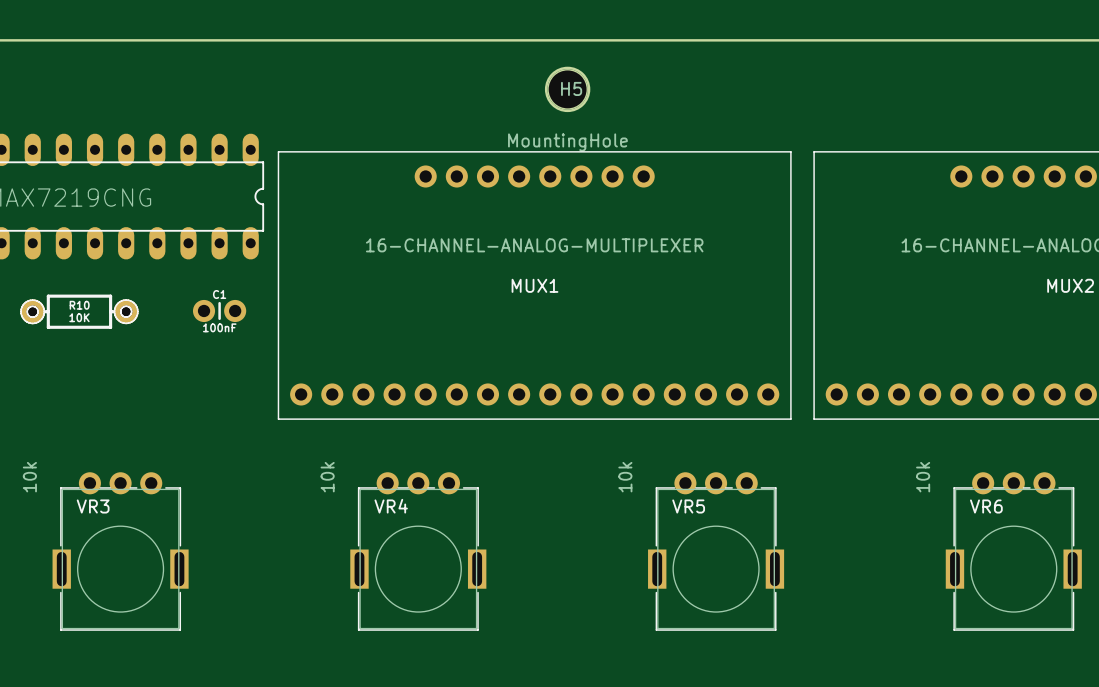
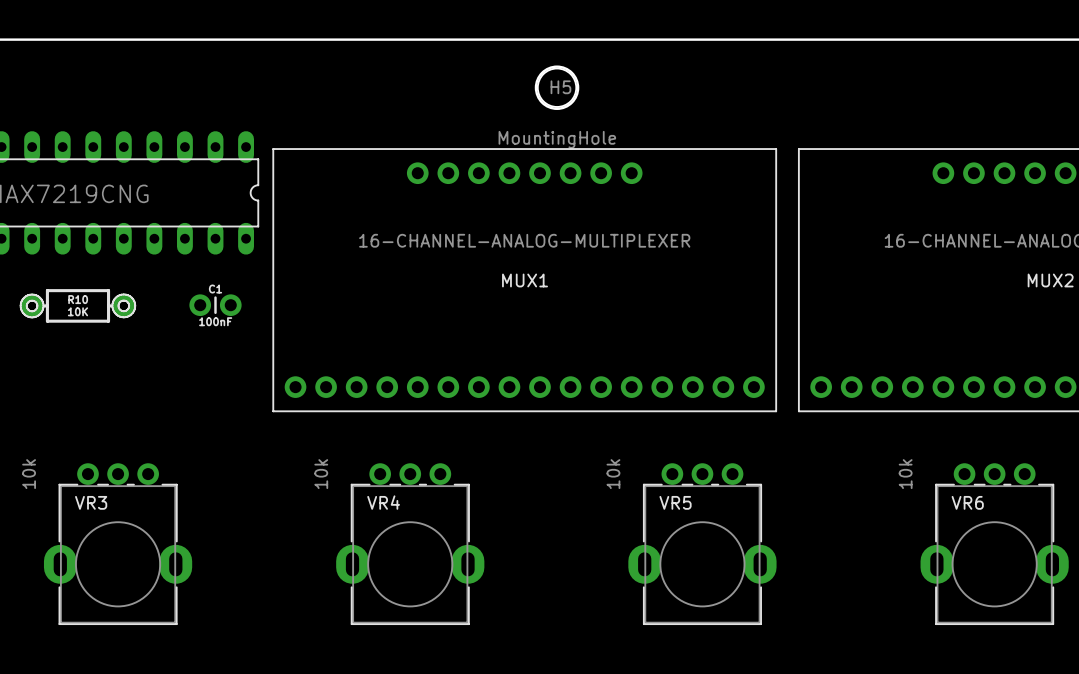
VR3 footprint: [52, 472, 189, 631] -> [43, 463, 193, 625]
VR4 footprint: [350, 472, 487, 631] -> [336, 463, 485, 625]
VR5 footprint: [648, 472, 785, 631] -> [628, 463, 777, 625]
VR6 footprint: [945, 472, 1082, 631] -> [920, 463, 1069, 625]

